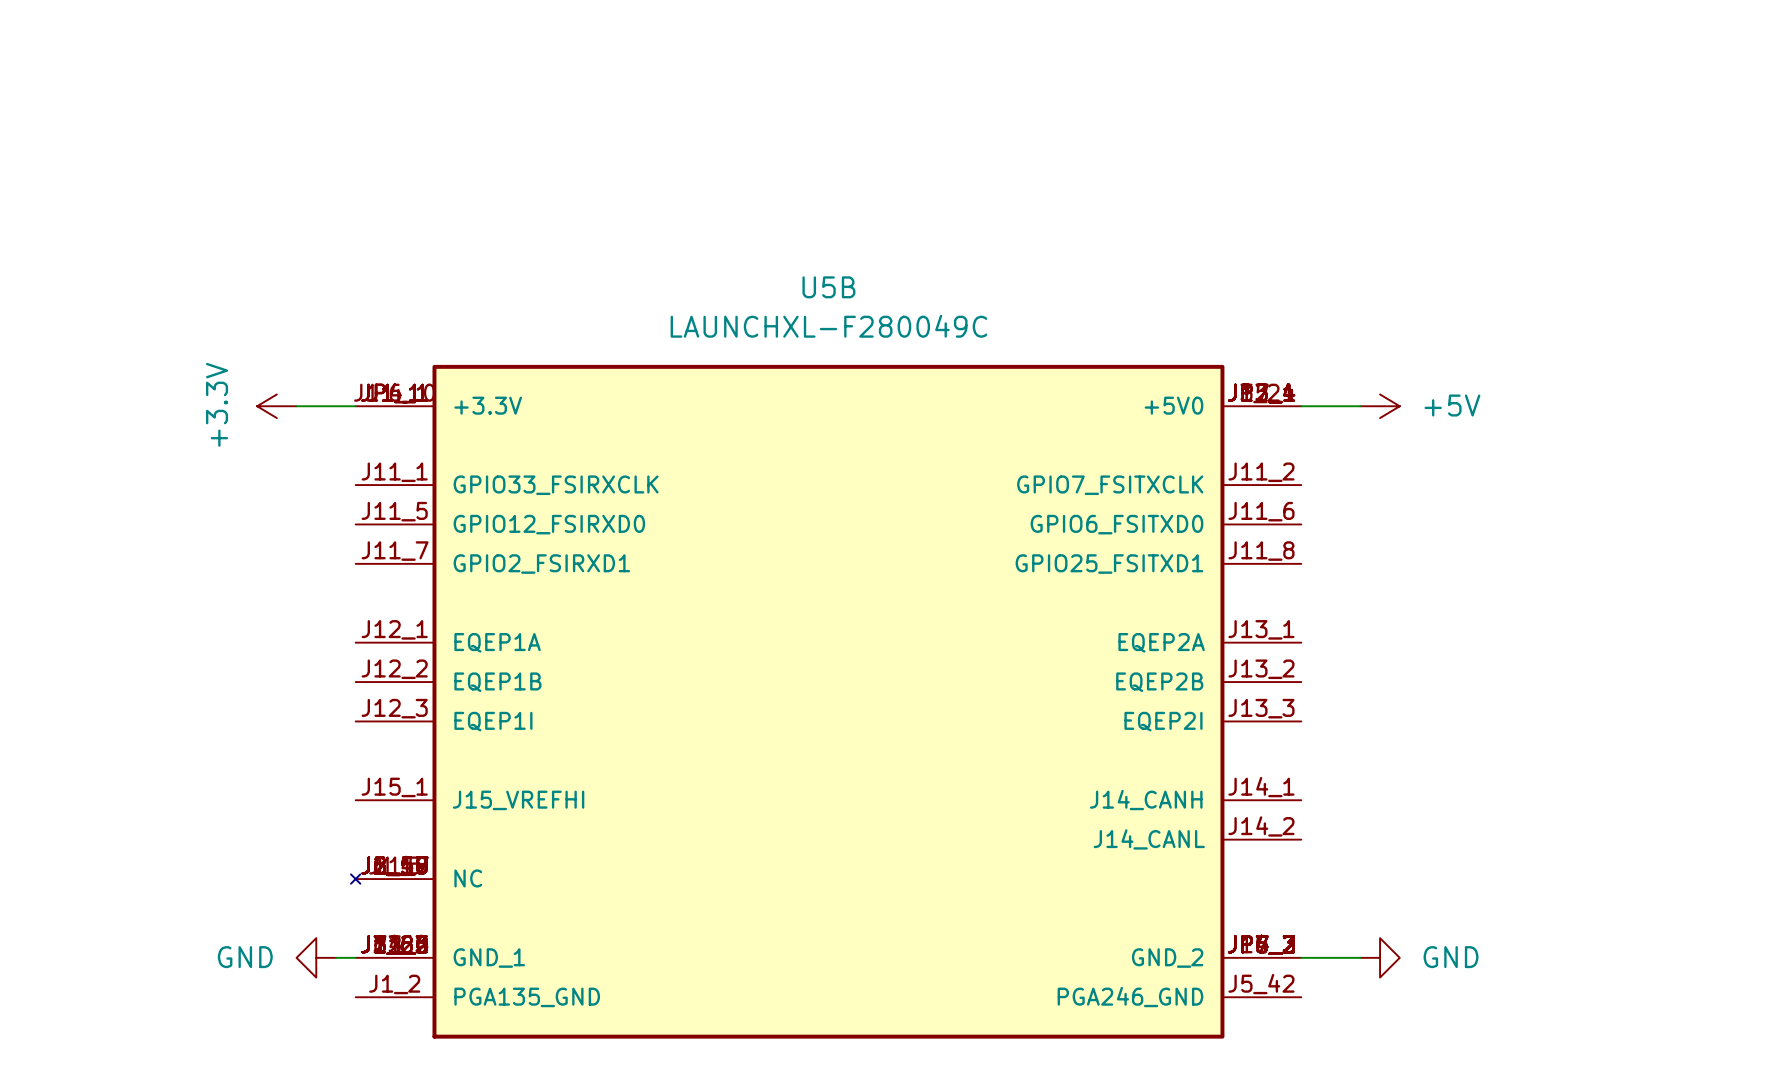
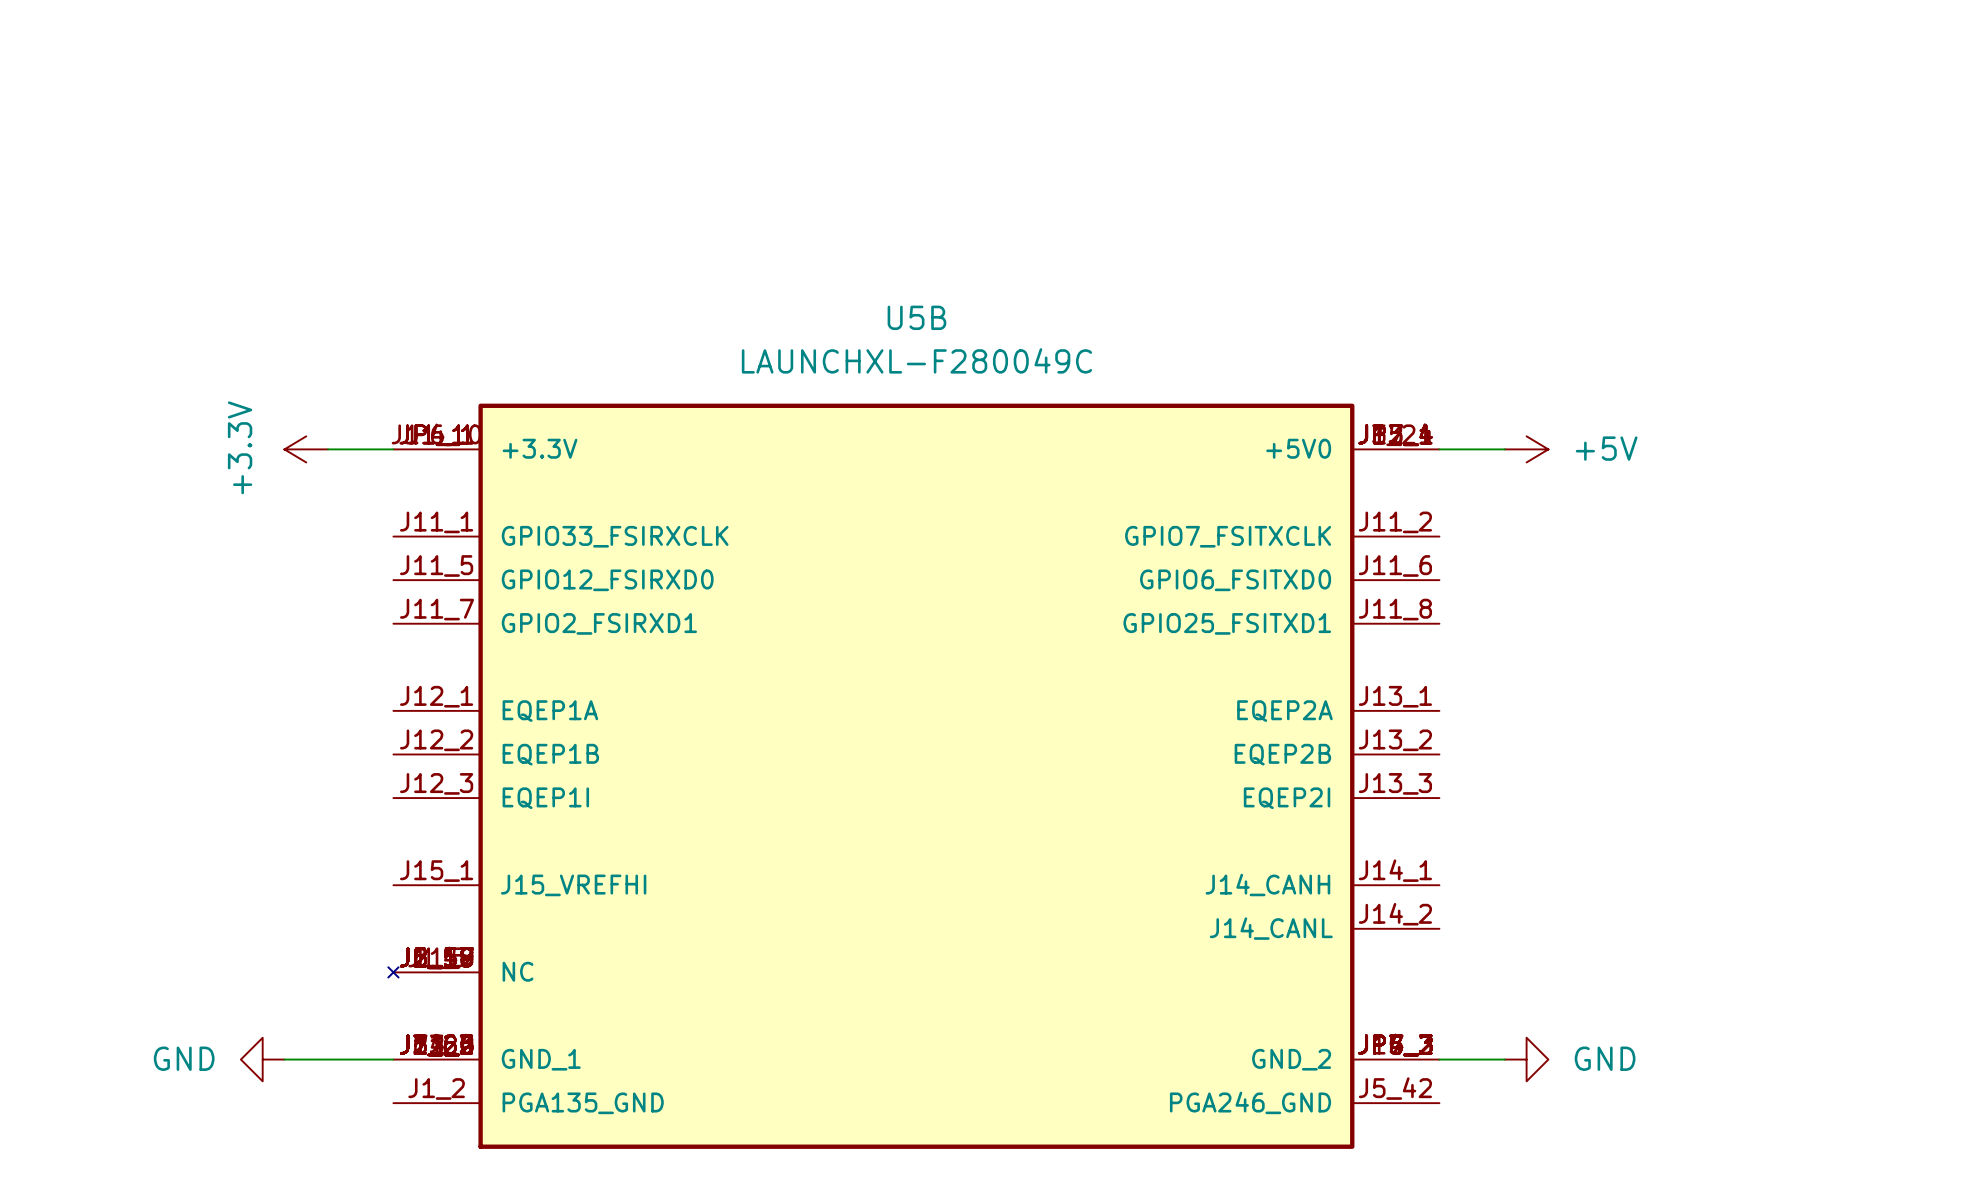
wire: none -> (284, 1059) (371, 1059)
power symbol position: GND (316, 957) -> GND (262, 1059)

